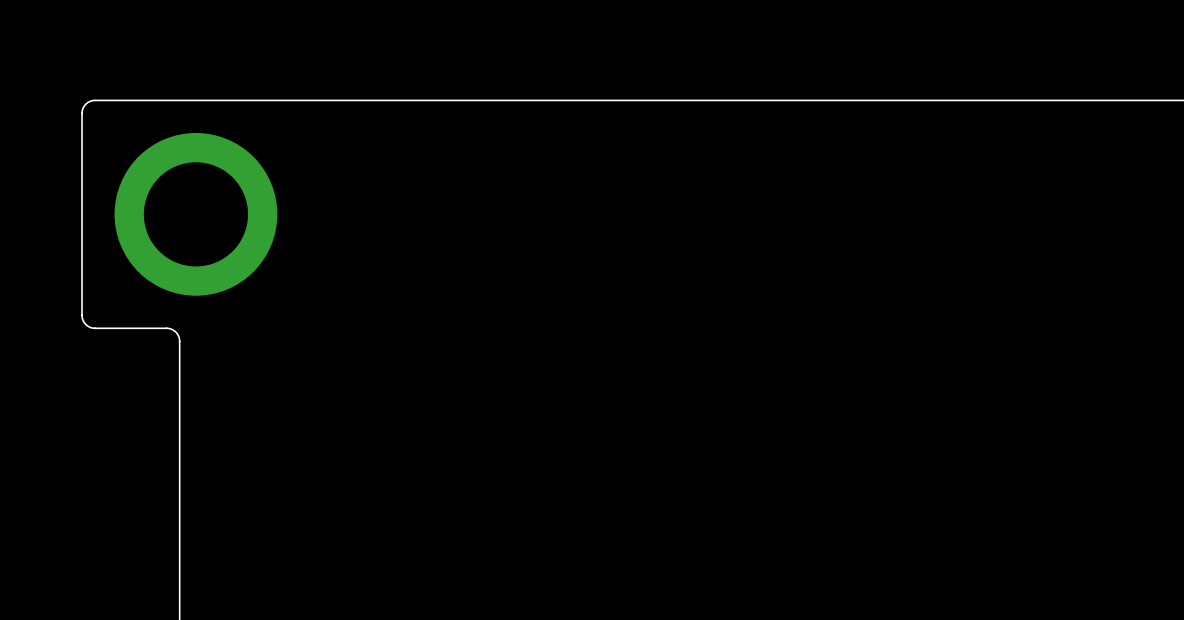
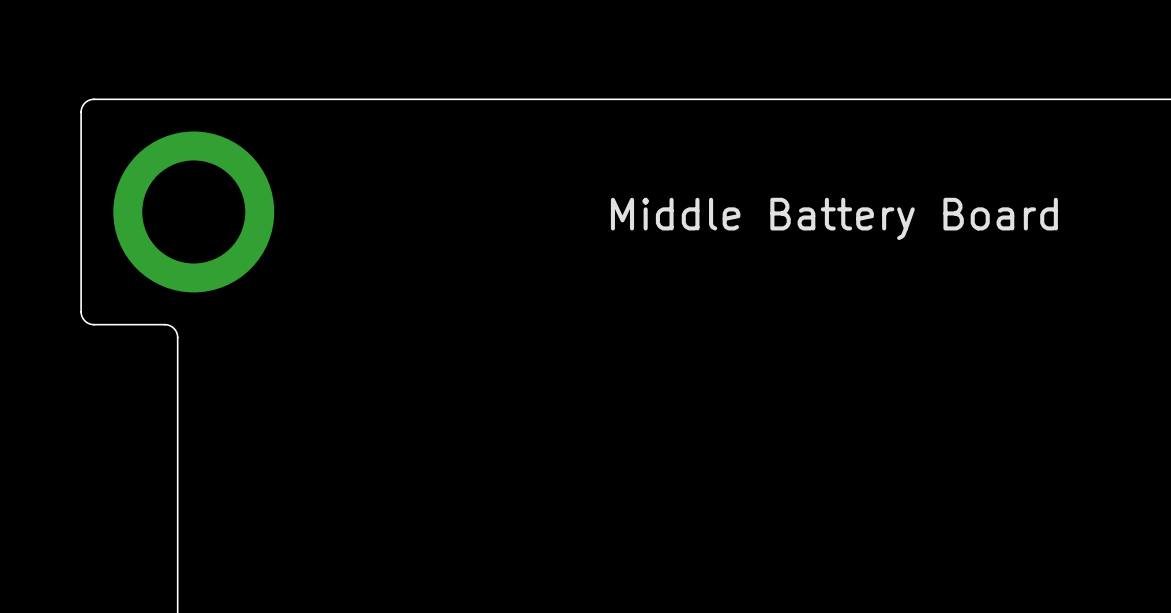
text: none -> Middle Battery Board (834, 218)

